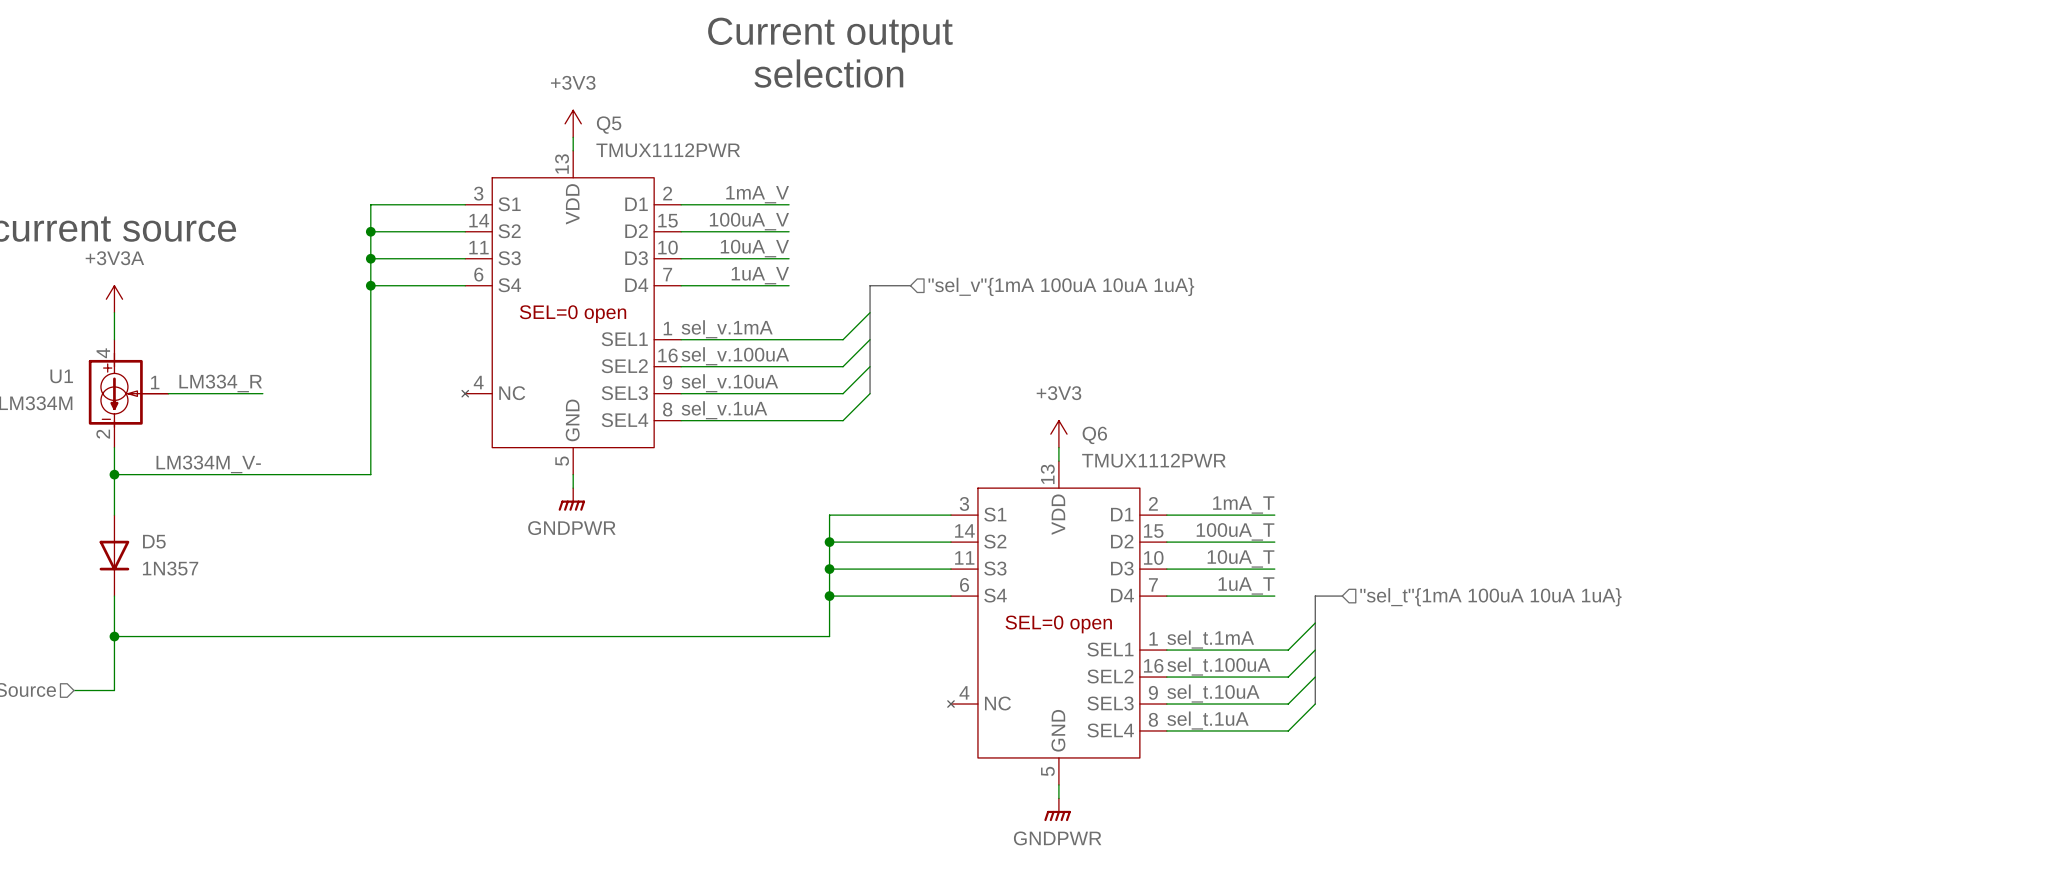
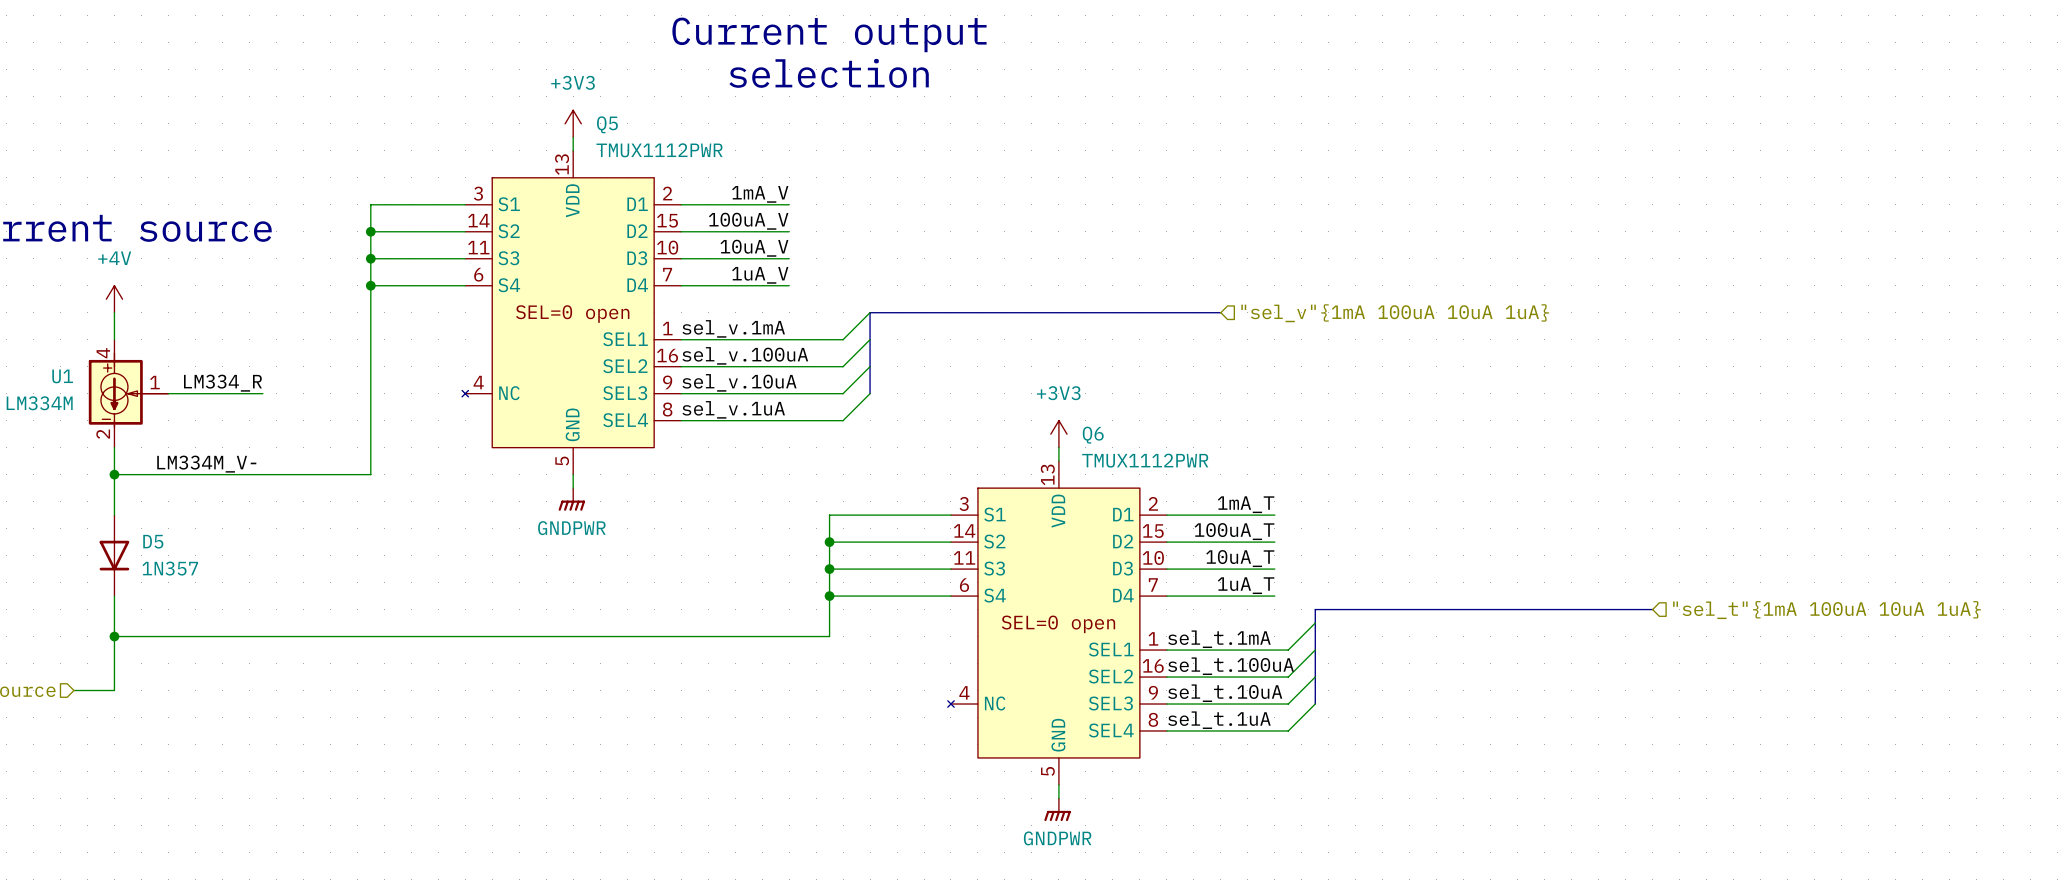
bus: (910, 285) (870, 285) (870, 312) -> (1220, 312) (870, 312)
hierarchical label: "sel_v"{1mA 100uA 10uA 1uA} (1061, 286) -> none
power symbol: +3V3A (114, 299) -> +4V (114, 299)
hierarchical label: none -> "sel_v"{1mA 100uA 10uA 1uA} (1395, 313)
bus: (1342, 596) (1315, 596) (1315, 609) -> (1652, 609) (1315, 609)
hierarchical label: "sel_t"{1mA 100uA 10uA 1uA} (1490, 597) -> none
hierarchical label: none -> "sel_t"{1mA 100uA 10uA 1uA} (1827, 610)

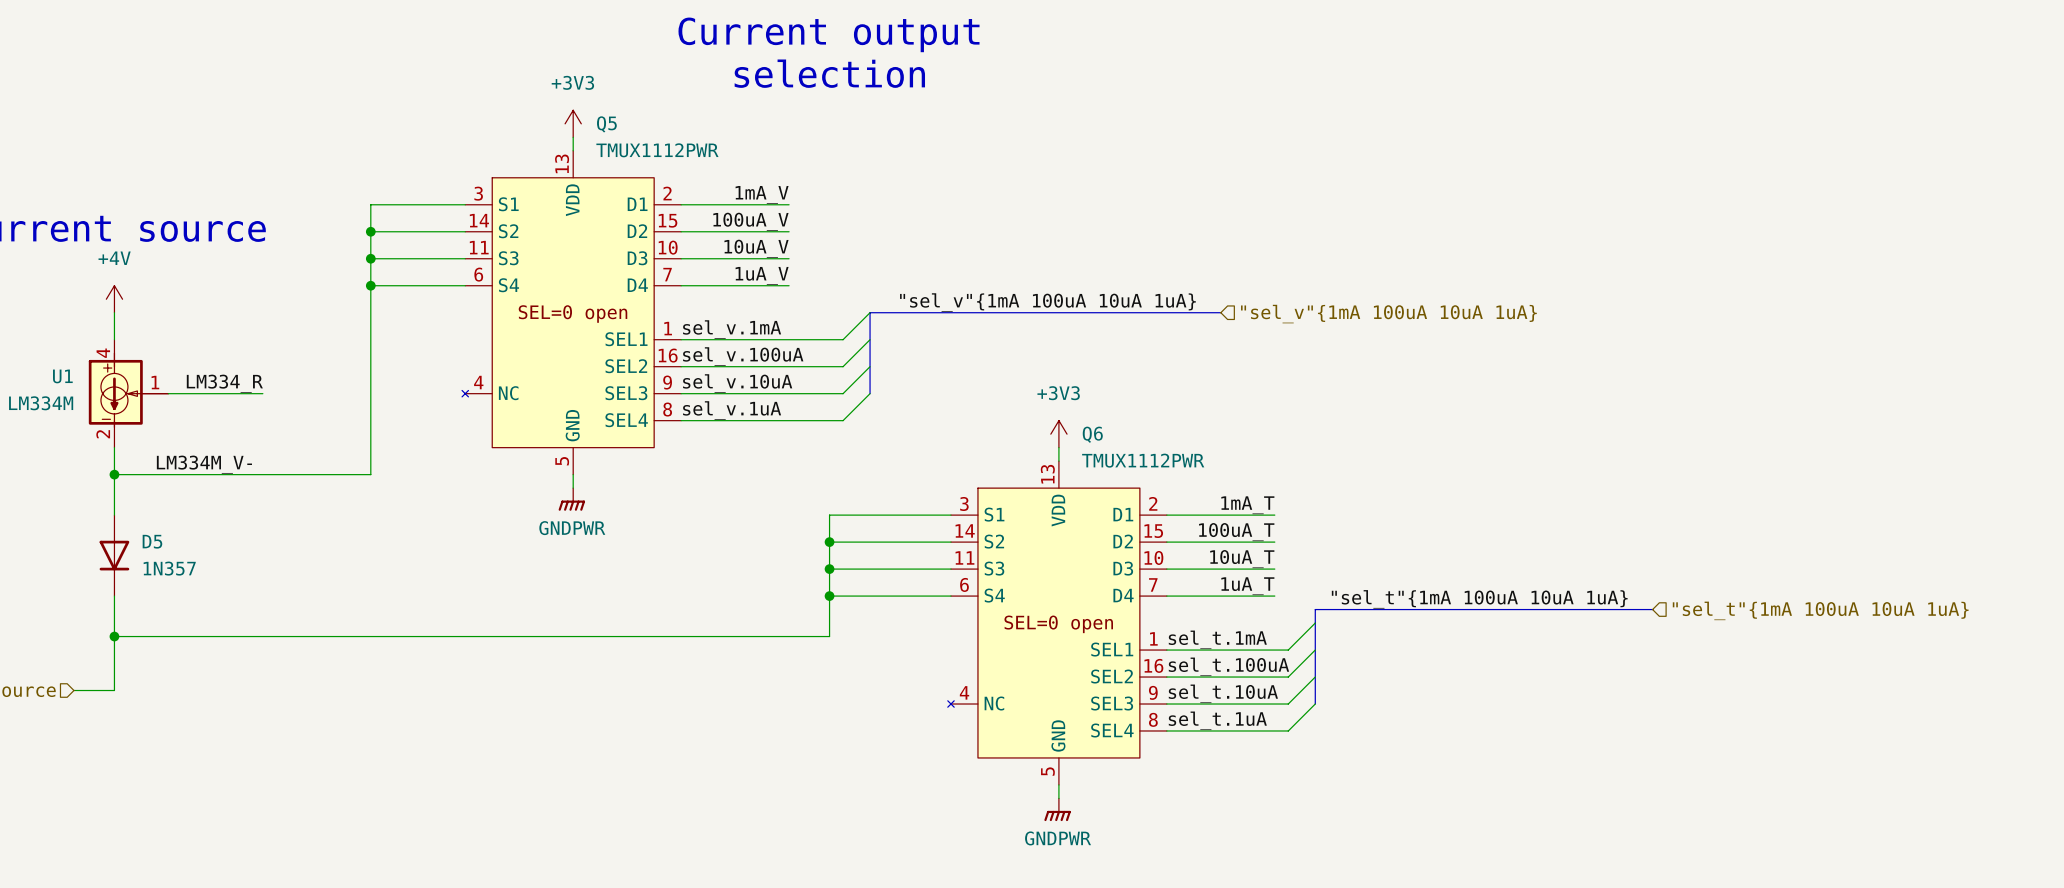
label: none -> "sel_v"{1mA 100uA 10uA 1uA} (1047, 302)
label: none -> "sel_t"{1mA 100uA 10uA 1uA} (1479, 599)

